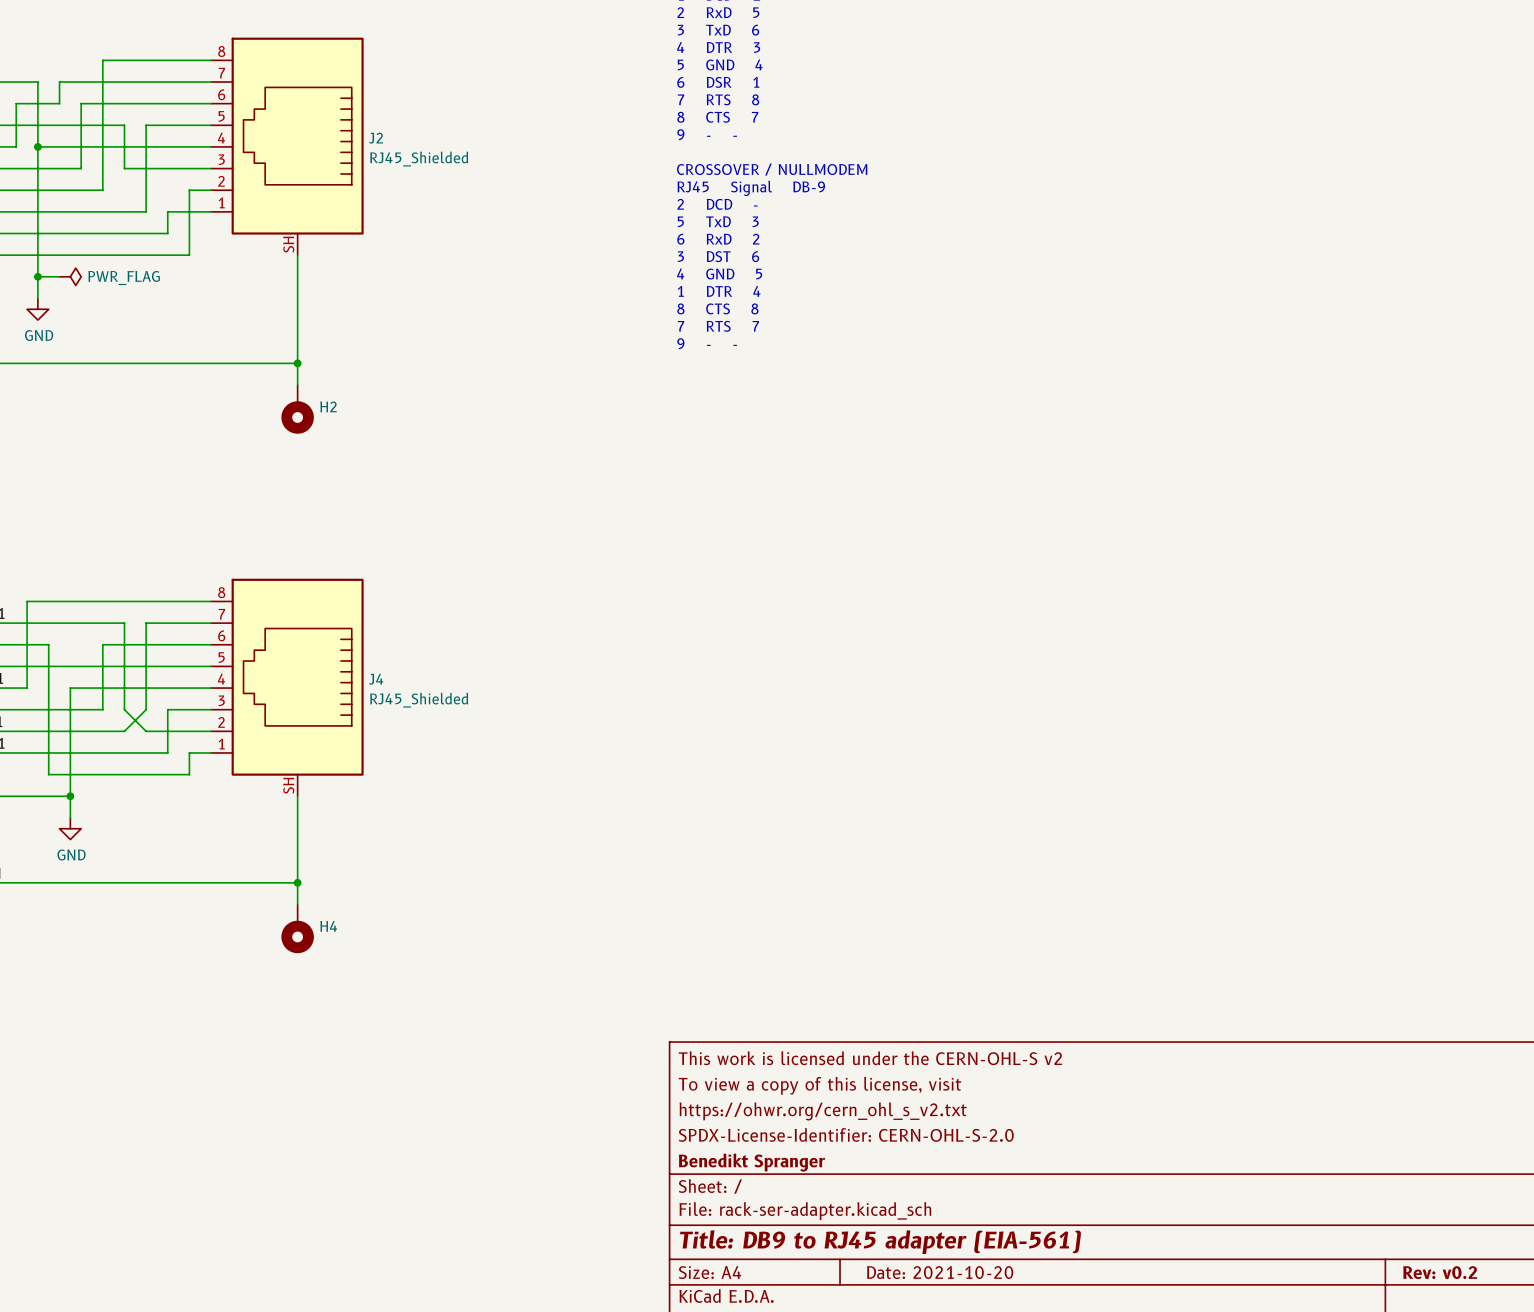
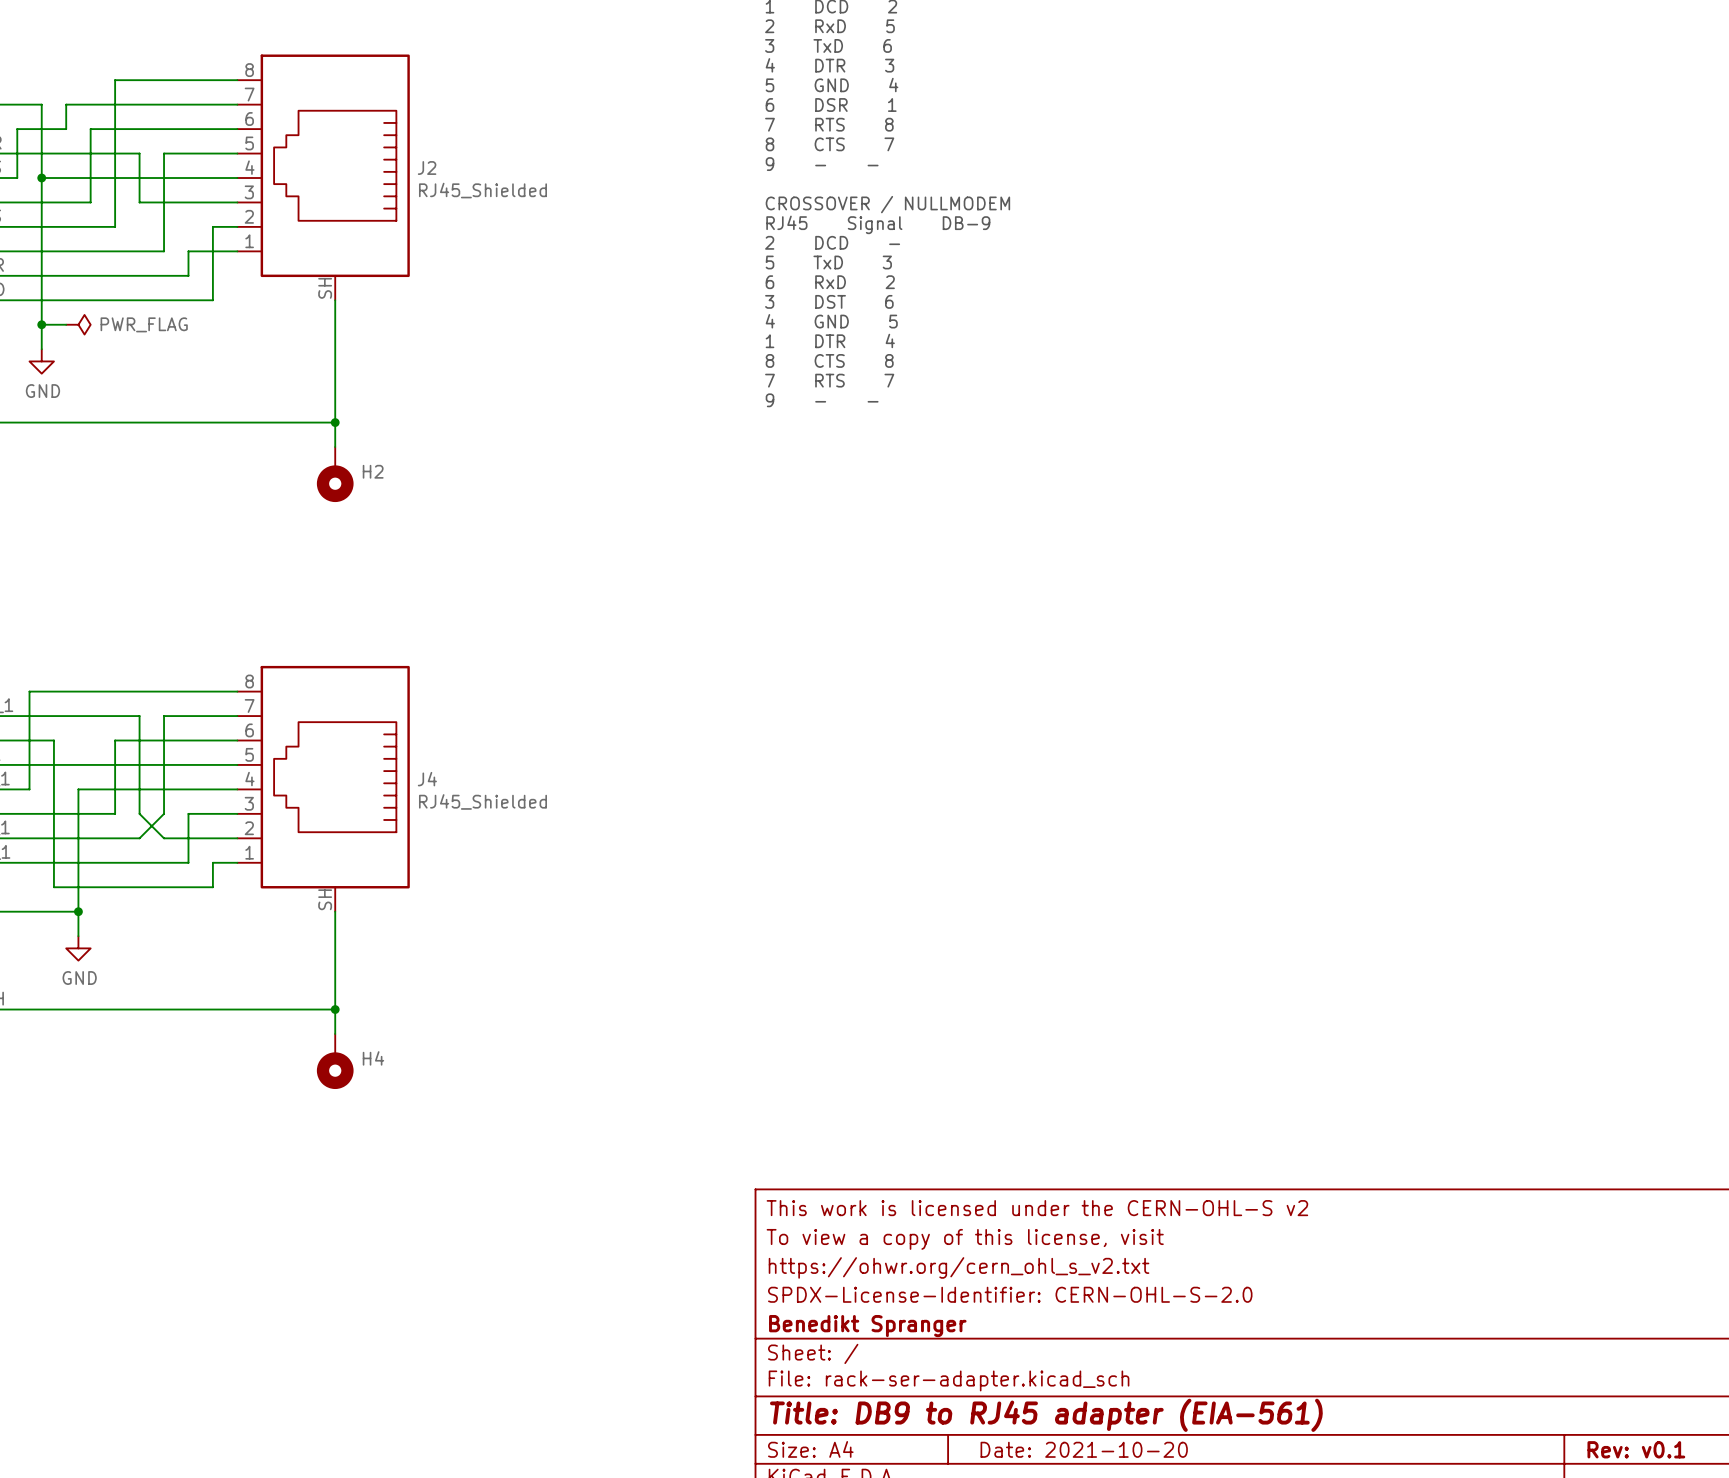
title block: Rev: v0.2 (1440, 1272) -> Rev: v0.1 (1636, 1449)

